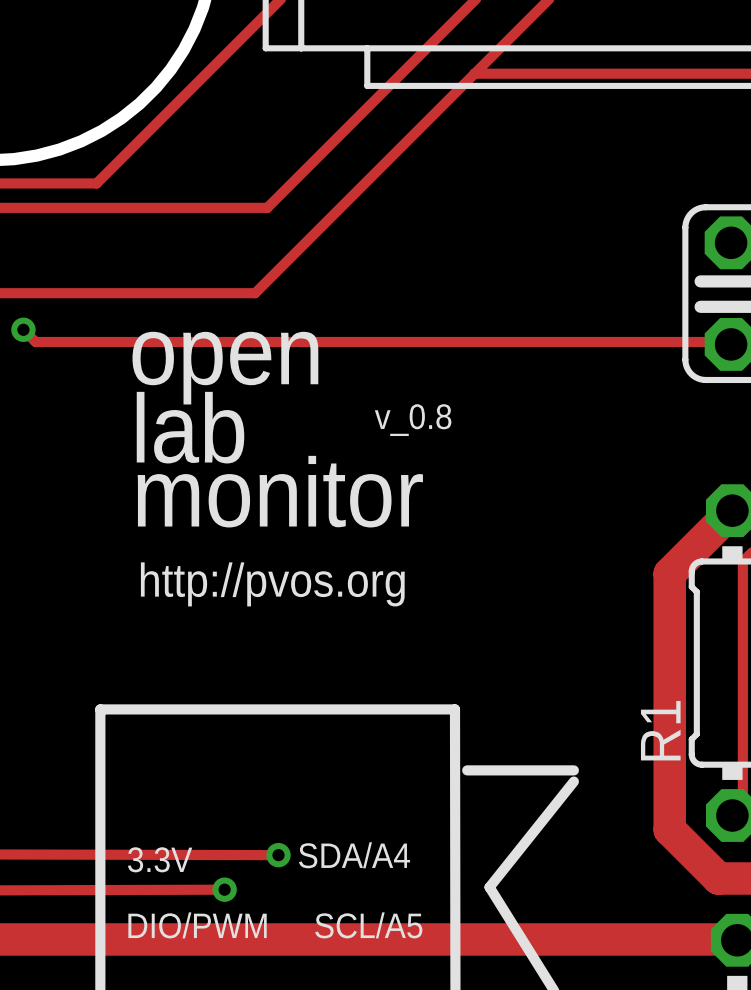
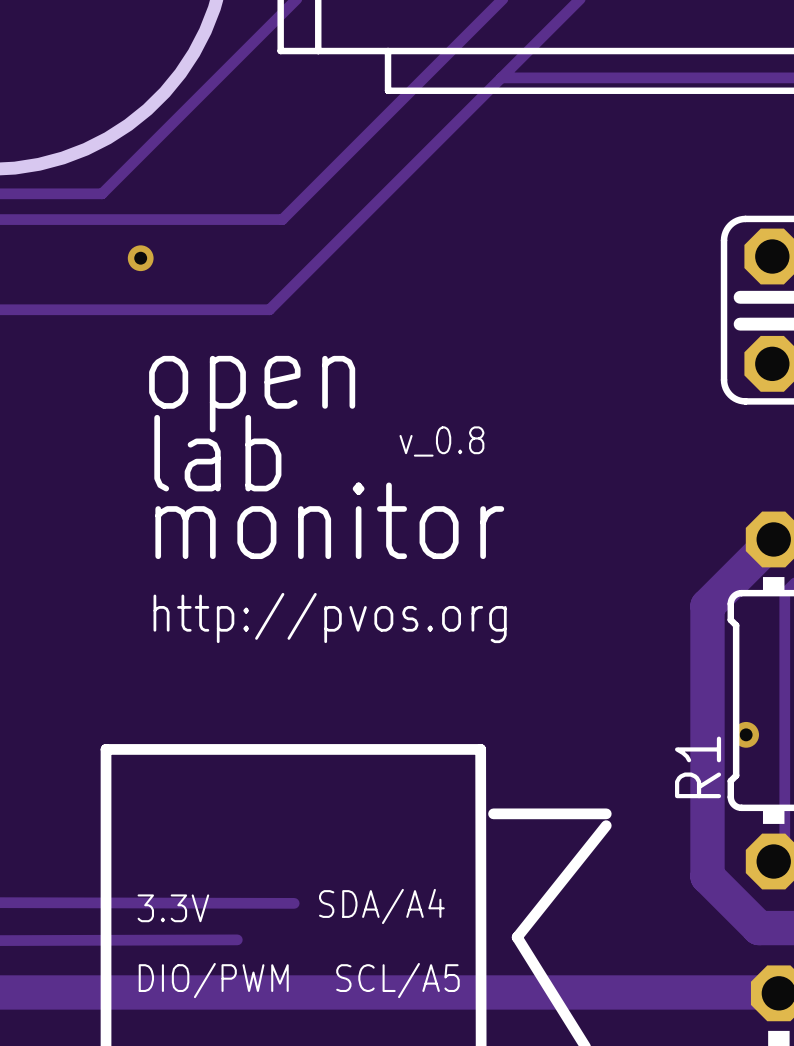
via: none -> (140, 258)
track: (23, 329) (35, 341) (730, 341) (731, 344) -> none
via: (23, 329) -> none
via: none -> (746, 734)
via: (278, 855) -> none
via: (224, 889) -> none

